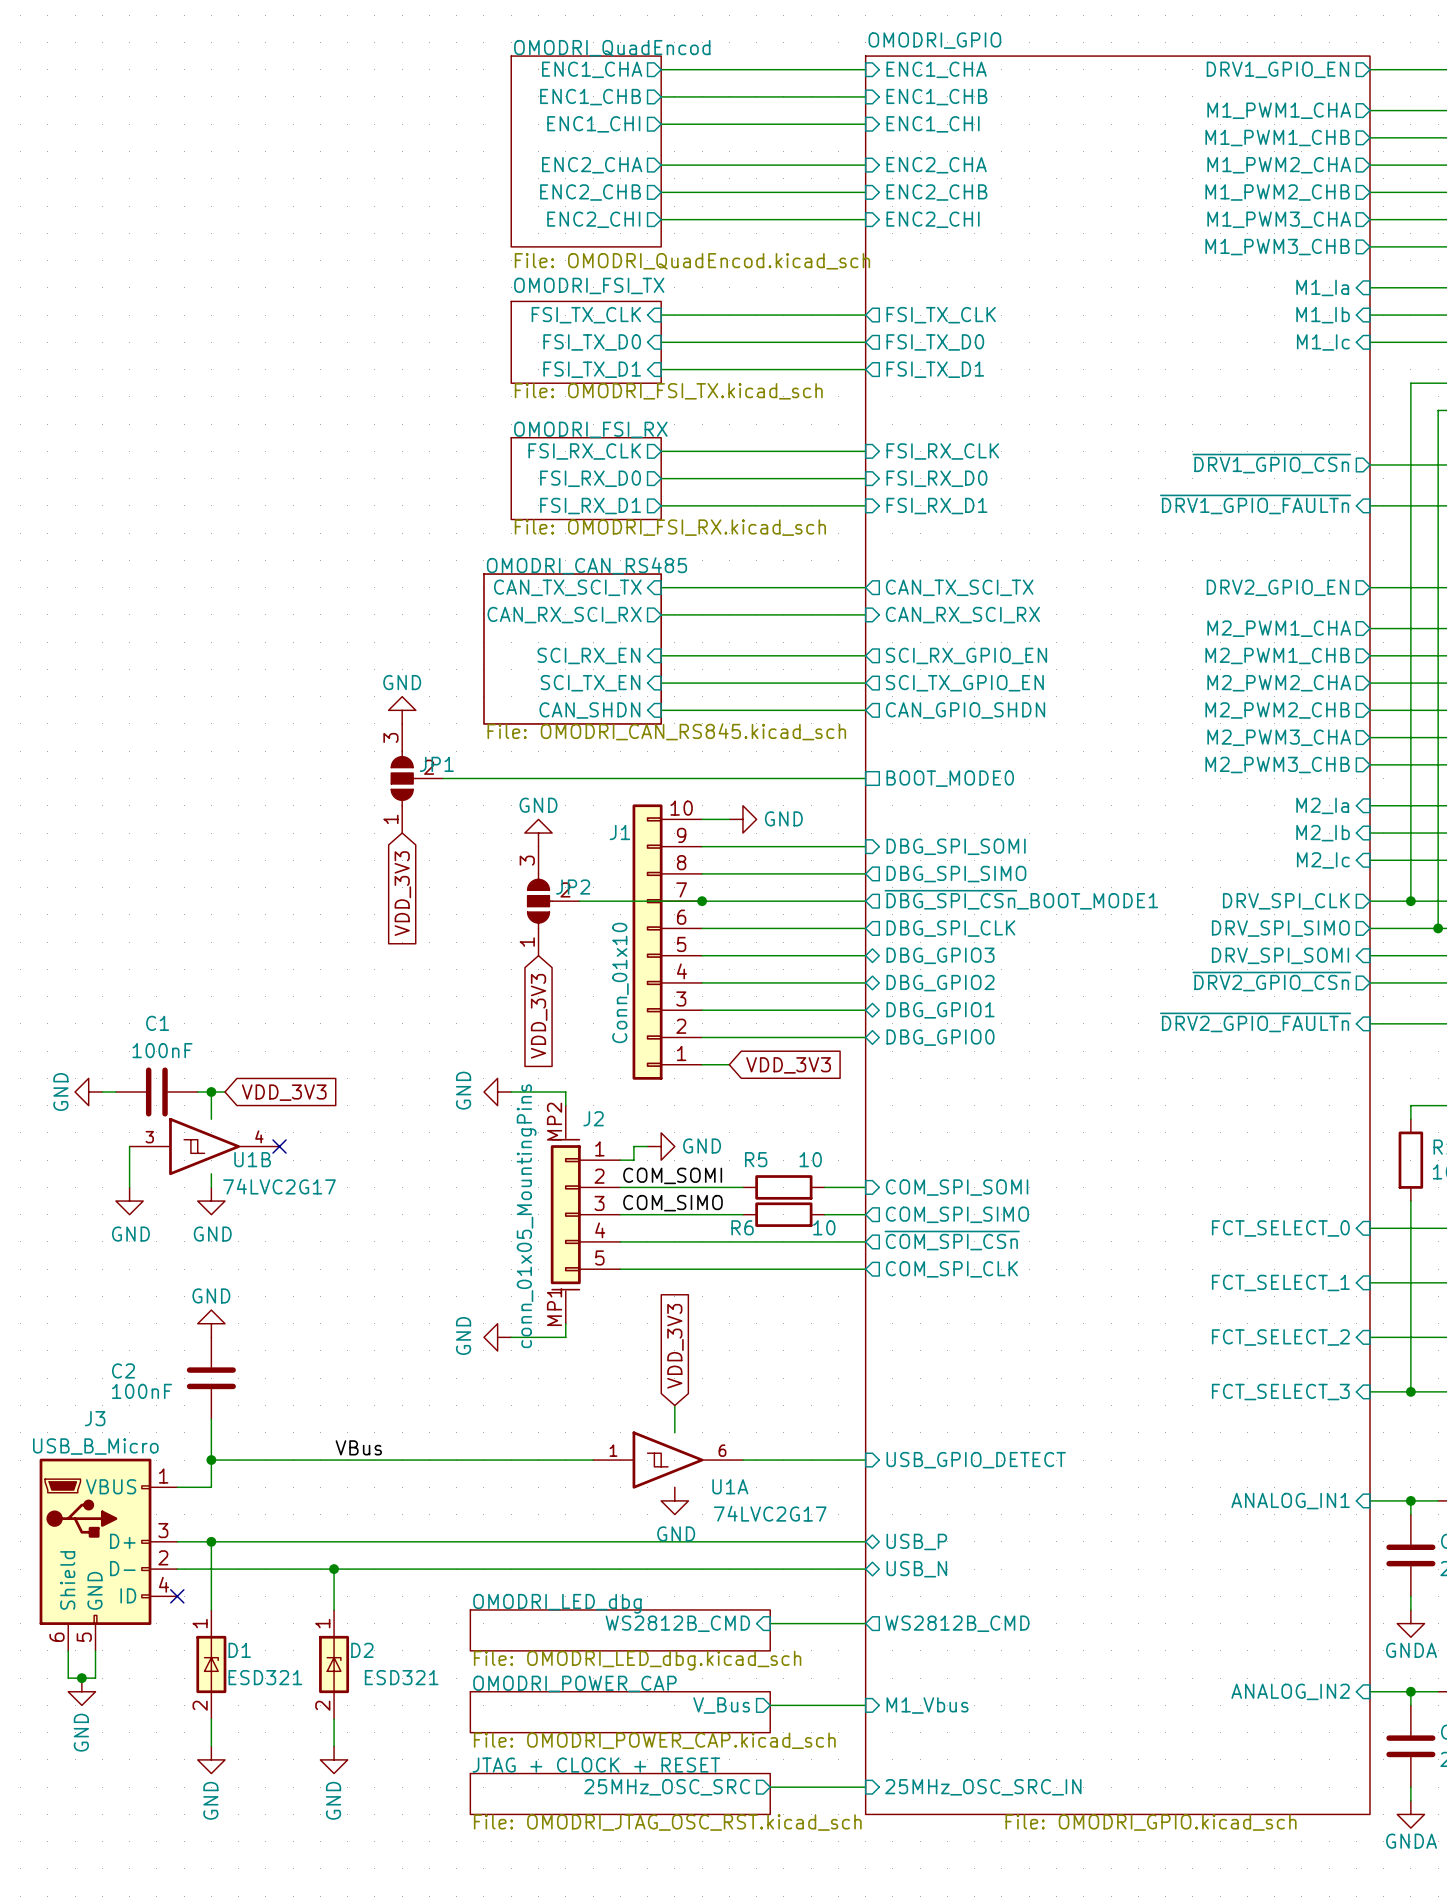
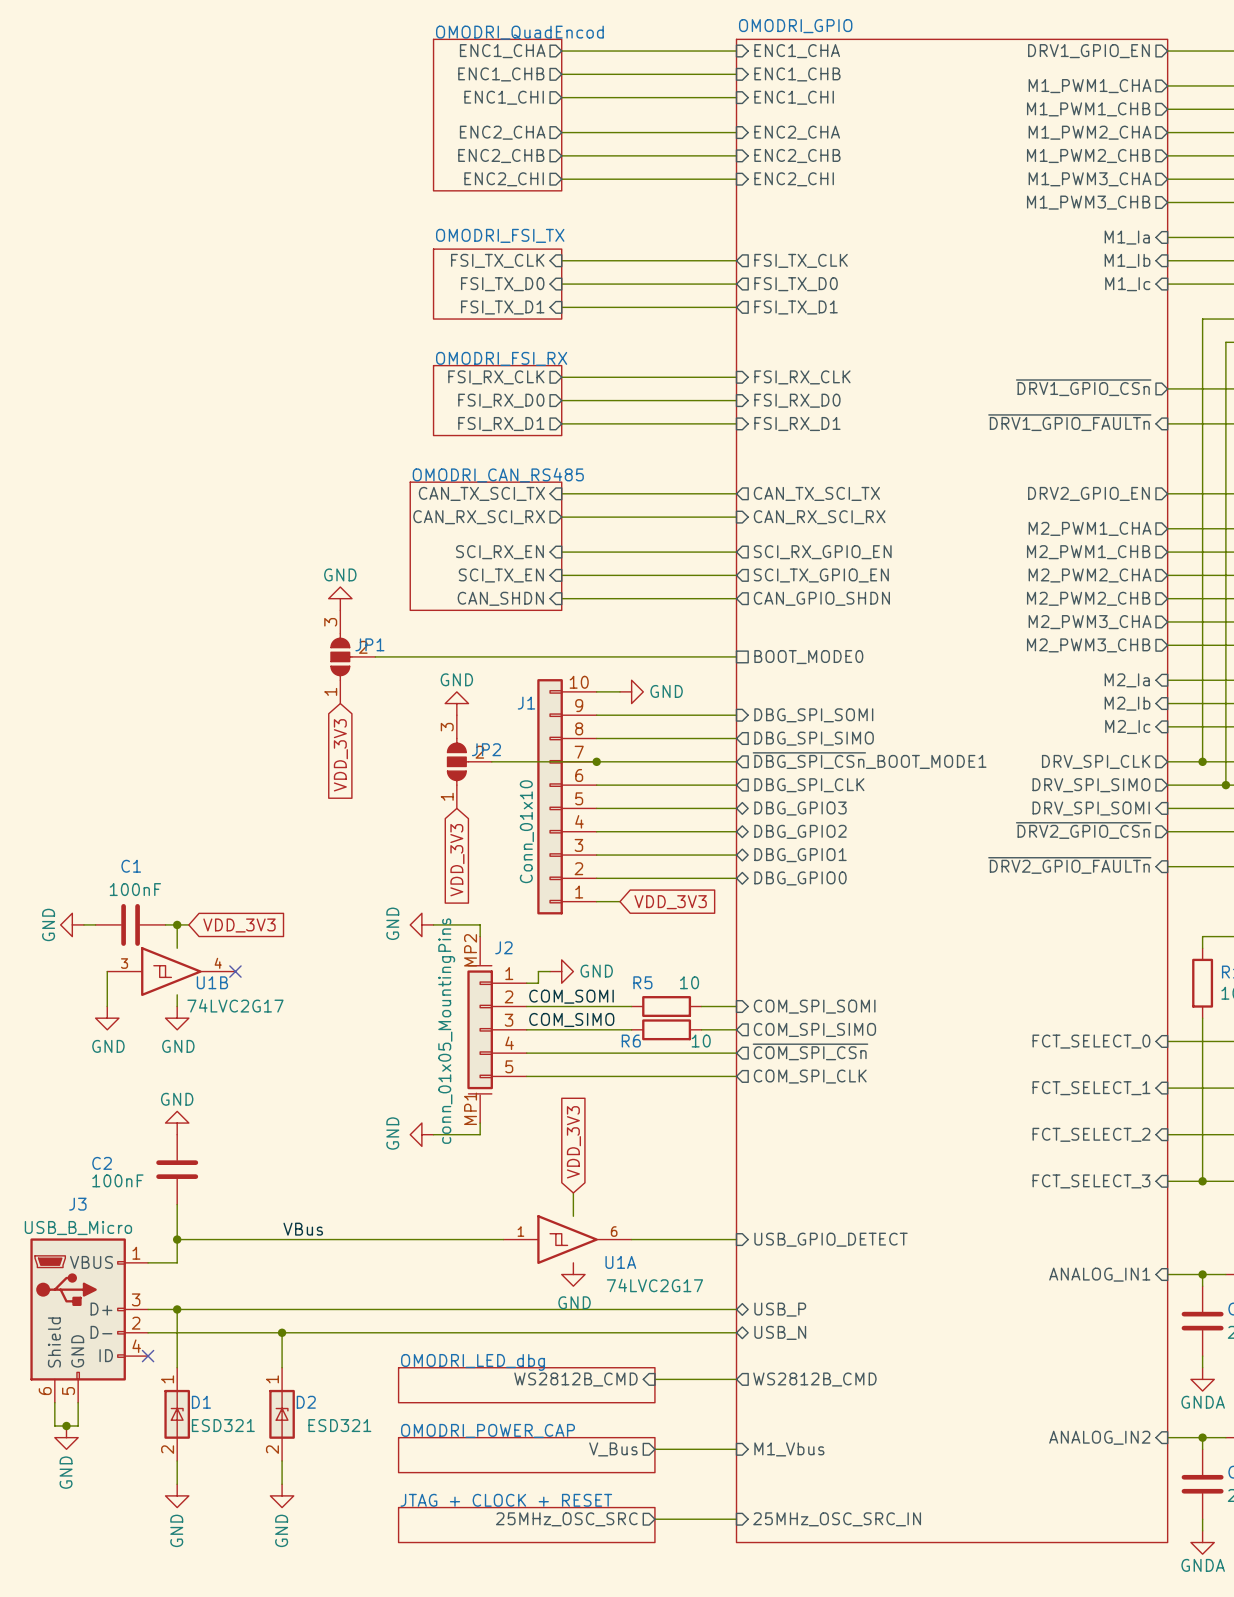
sheet OMODRI_QuadEncod shape: [511, 56, 662, 247] -> [433, 39, 562, 191]
sheet OMODRI_QuadEncod value: File: OMODRI_QuadEncod.kicad_sch (692, 261) -> none
sheet OMODRI_FSI_TX value: File: OMODRI_FSI_TX.kicad_sch (668, 391) -> none
sheet OMODRI_FSI_RX value: File: OMODRI_FSI_RX.kicad_sch (670, 527) -> none
sheet OMODRI_CAN_RS485 value: File: OMODRI_CAN_RS845.kicad_sch (666, 731) -> none
sheet OMODRI_LED_dbg value: File: OMODRI_LED_dbg.kicad_sch (637, 1660) -> none
sheet OMODRI_POWER_CAP value: File: OMODRI_POWER_CAP.kicad_sch (654, 1740) -> none
sheet JTAG + CLOCK + RESET value: File: OMODRI_JTAG_OSC_RST.kicad_sch (667, 1822) -> none
sheet OMODRI_GPIO value: File: OMODRI_GPIO.kicad_sch (1151, 1822) -> none

